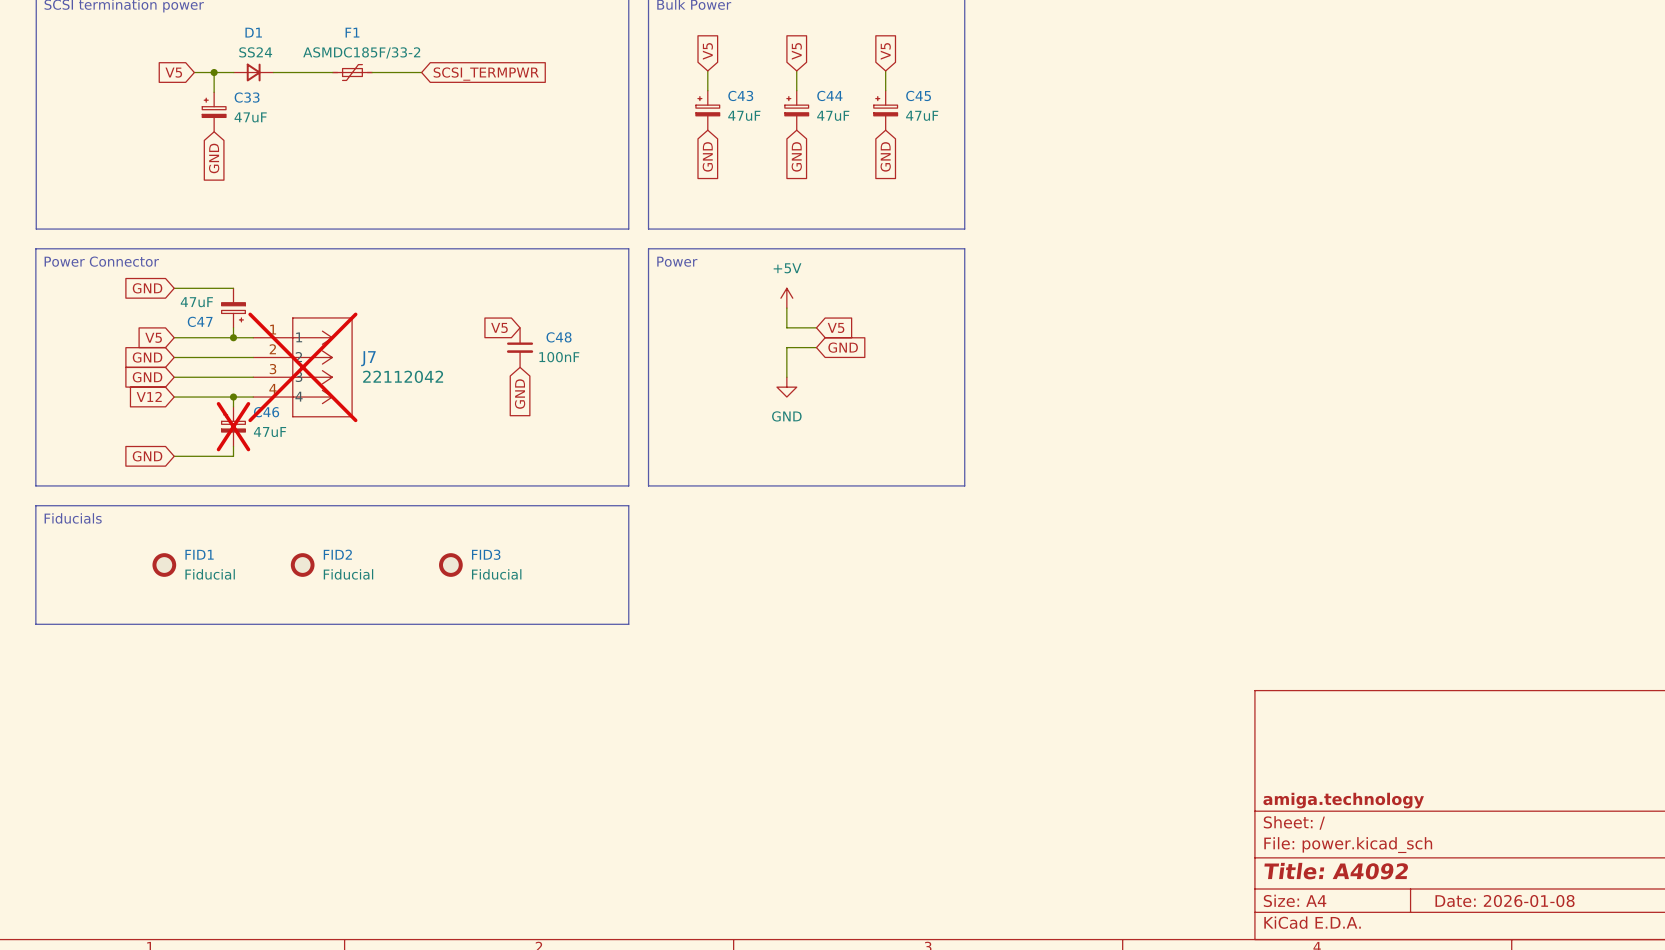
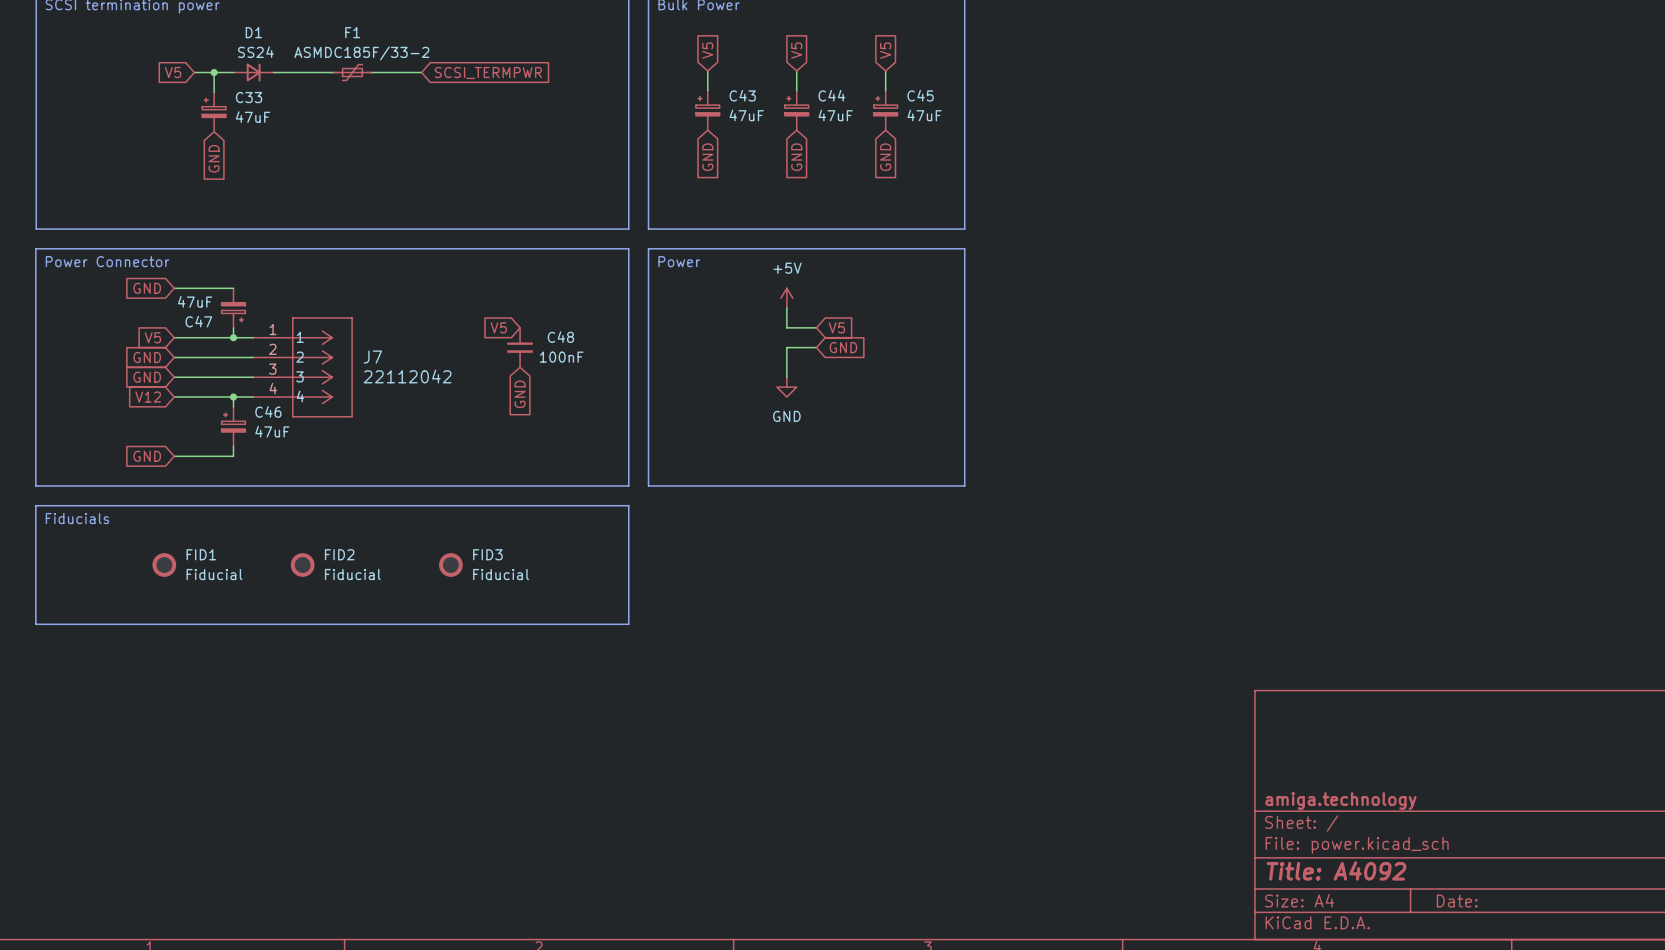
J7 do-not-place cross: (302, 367) -> none
C46 do-not-place cross: (233, 426) -> none
title block: Date: 2026-01-08 (1505, 901) -> Date: (1457, 901)

